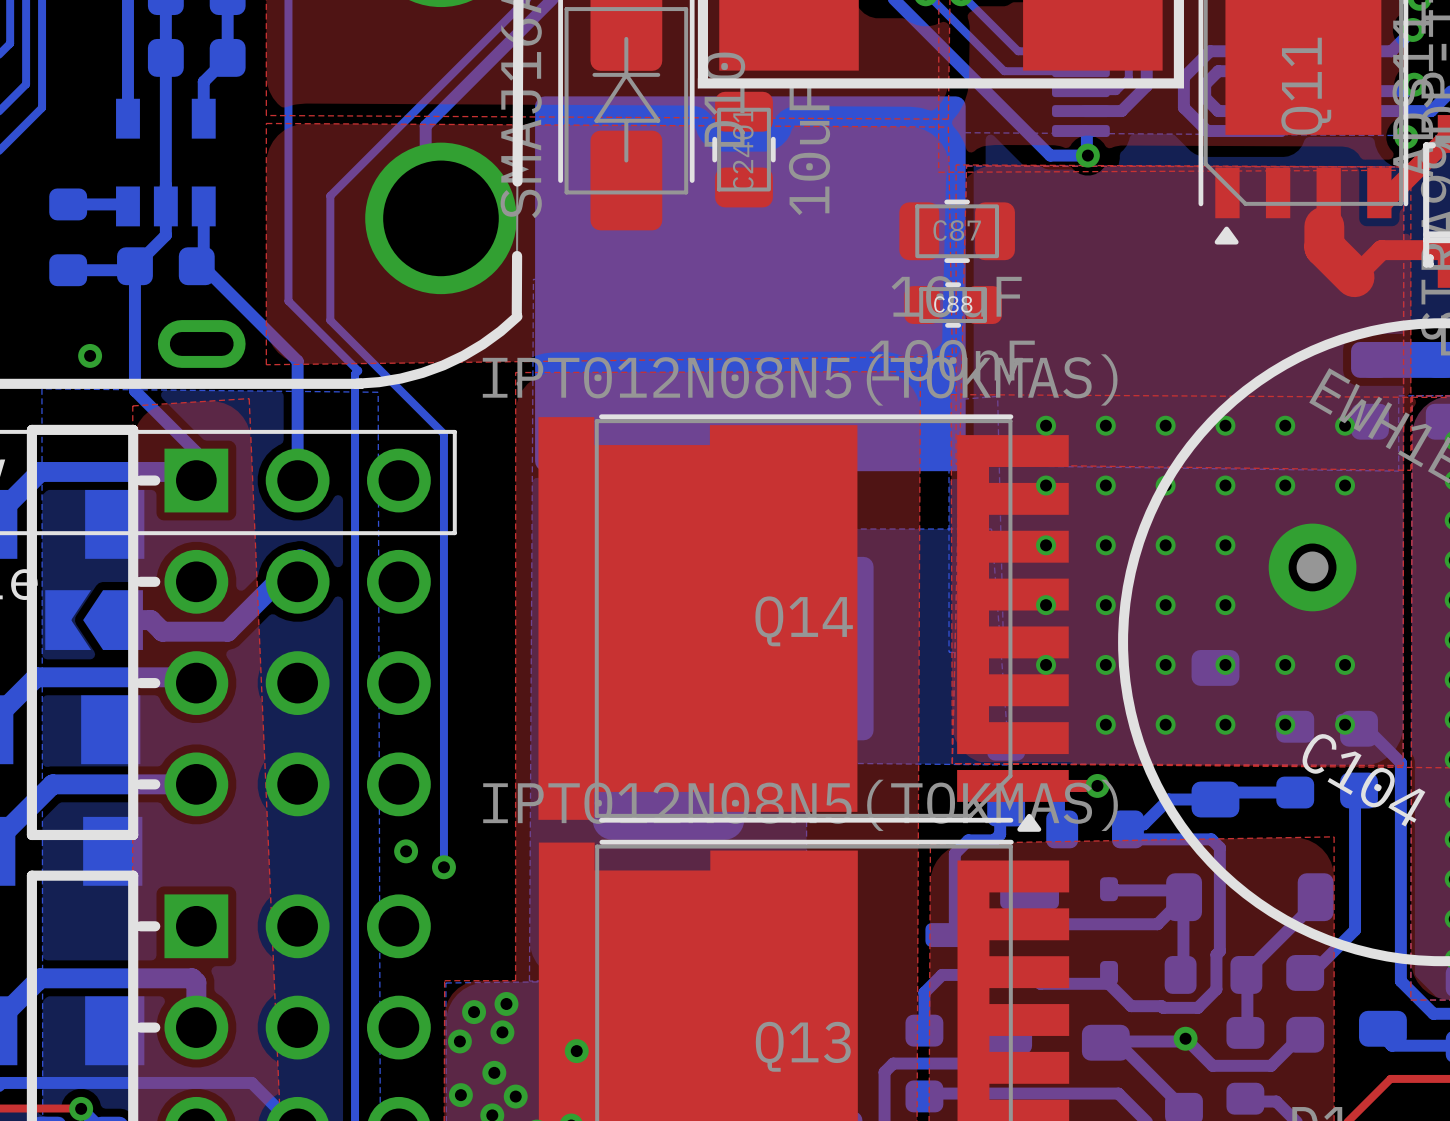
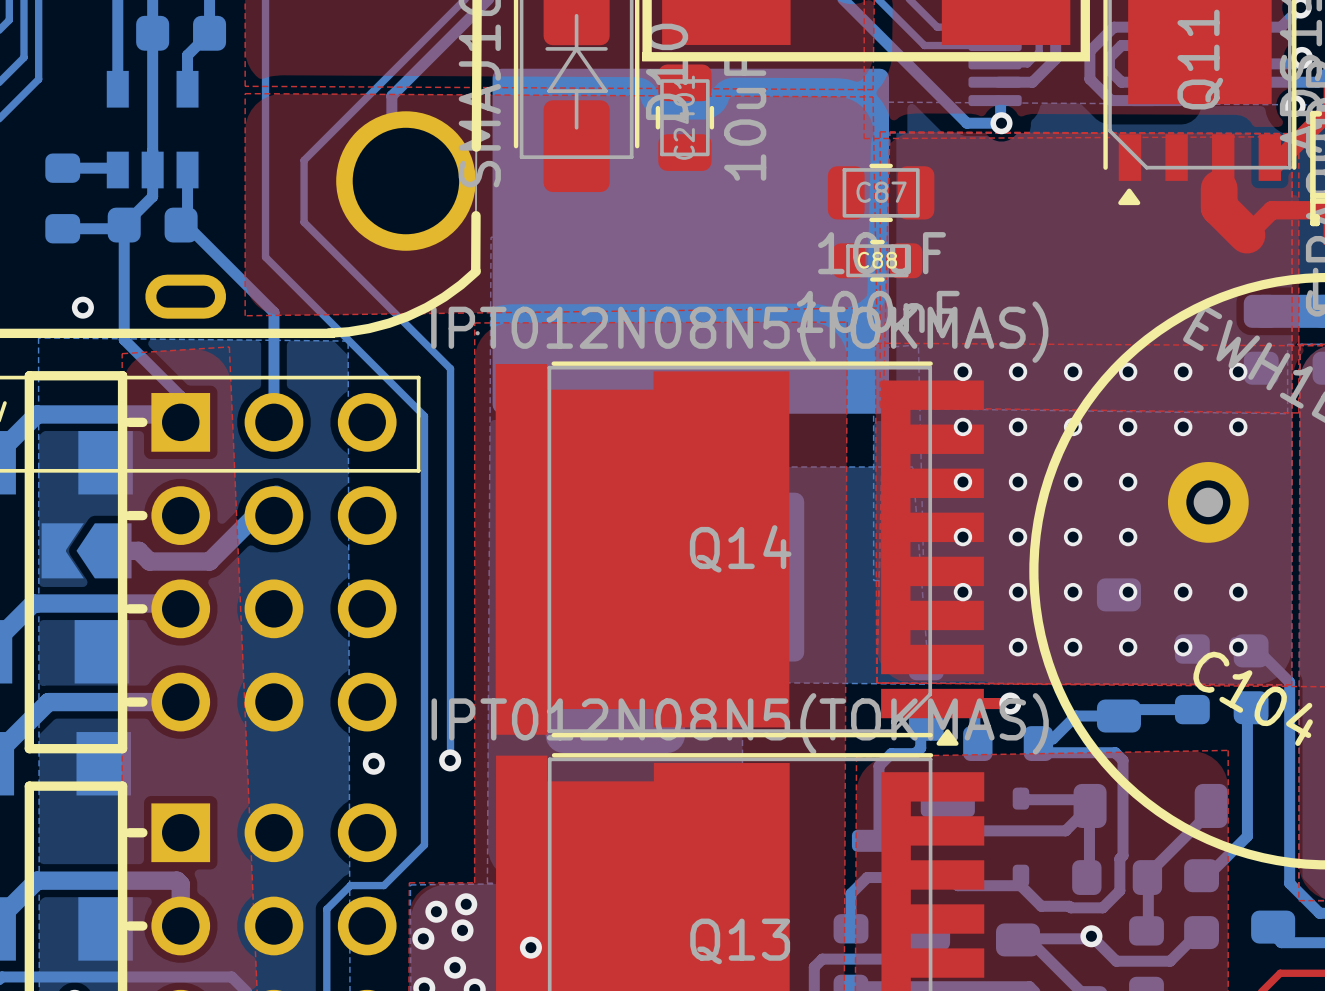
bottom track: (330, 263) (330, 320) (443, 434) (443, 867) -> (304, 222) (450, 368) (450, 760)
bottom track: (358, 370) (355, 374) (355, 1009) -> (329, 321) (424, 416) (424, 845) (383, 885) (350, 885) (326, 909)
via position: (443, 867) -> (450, 760)

